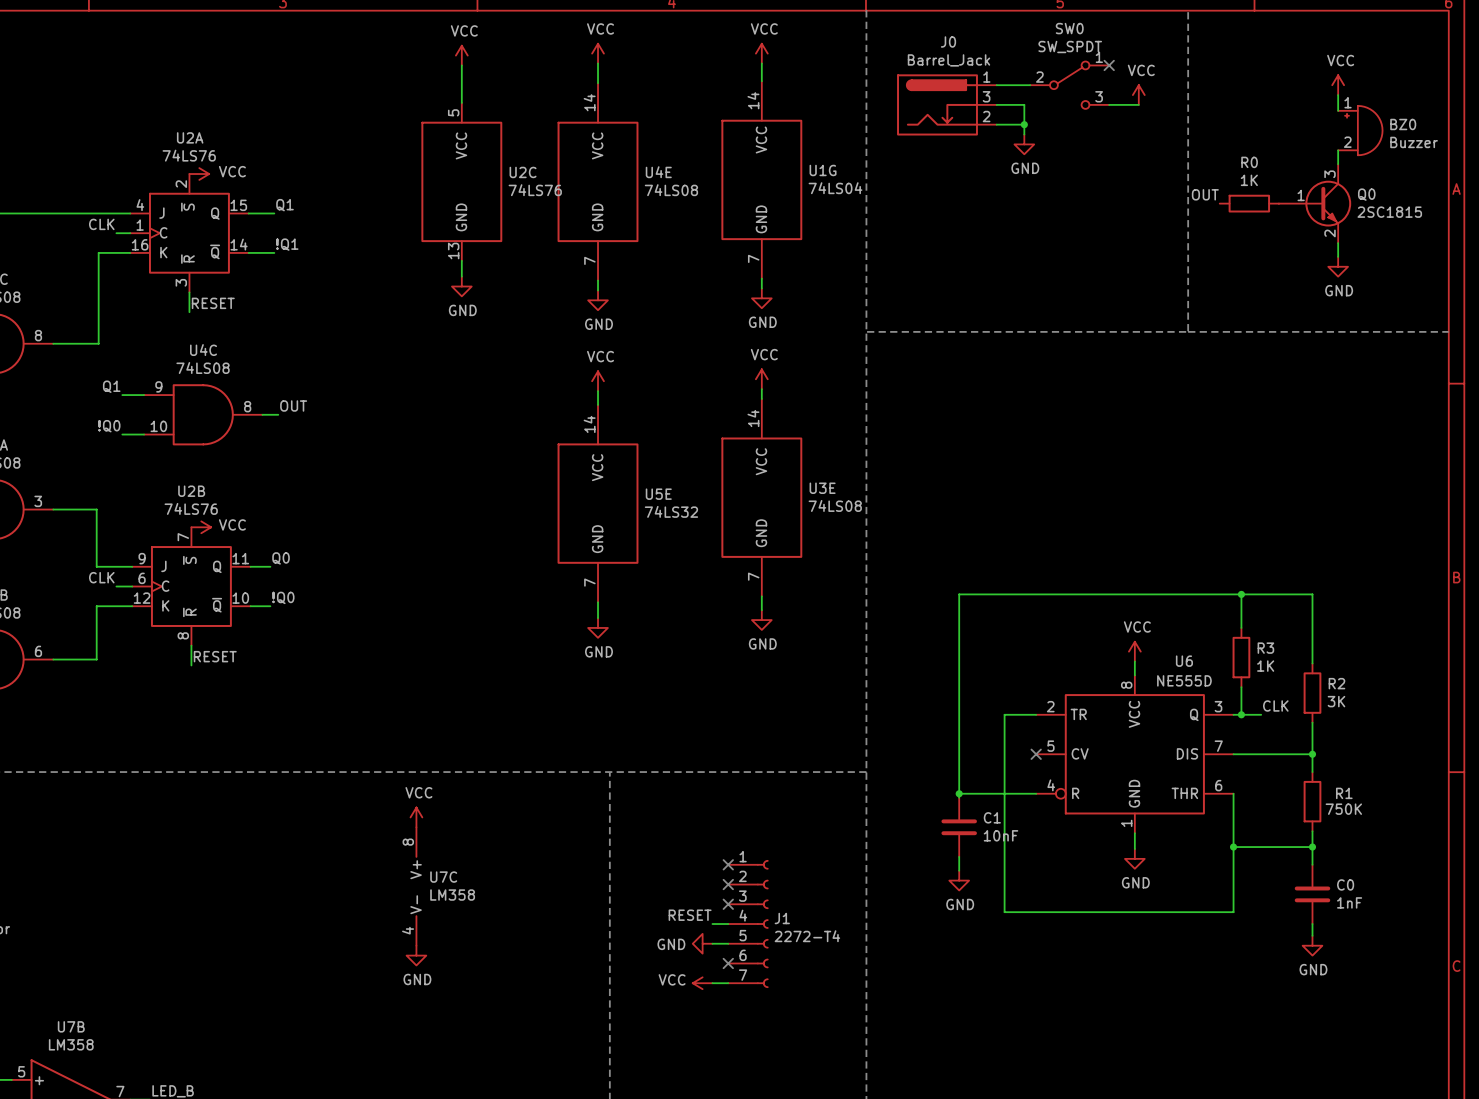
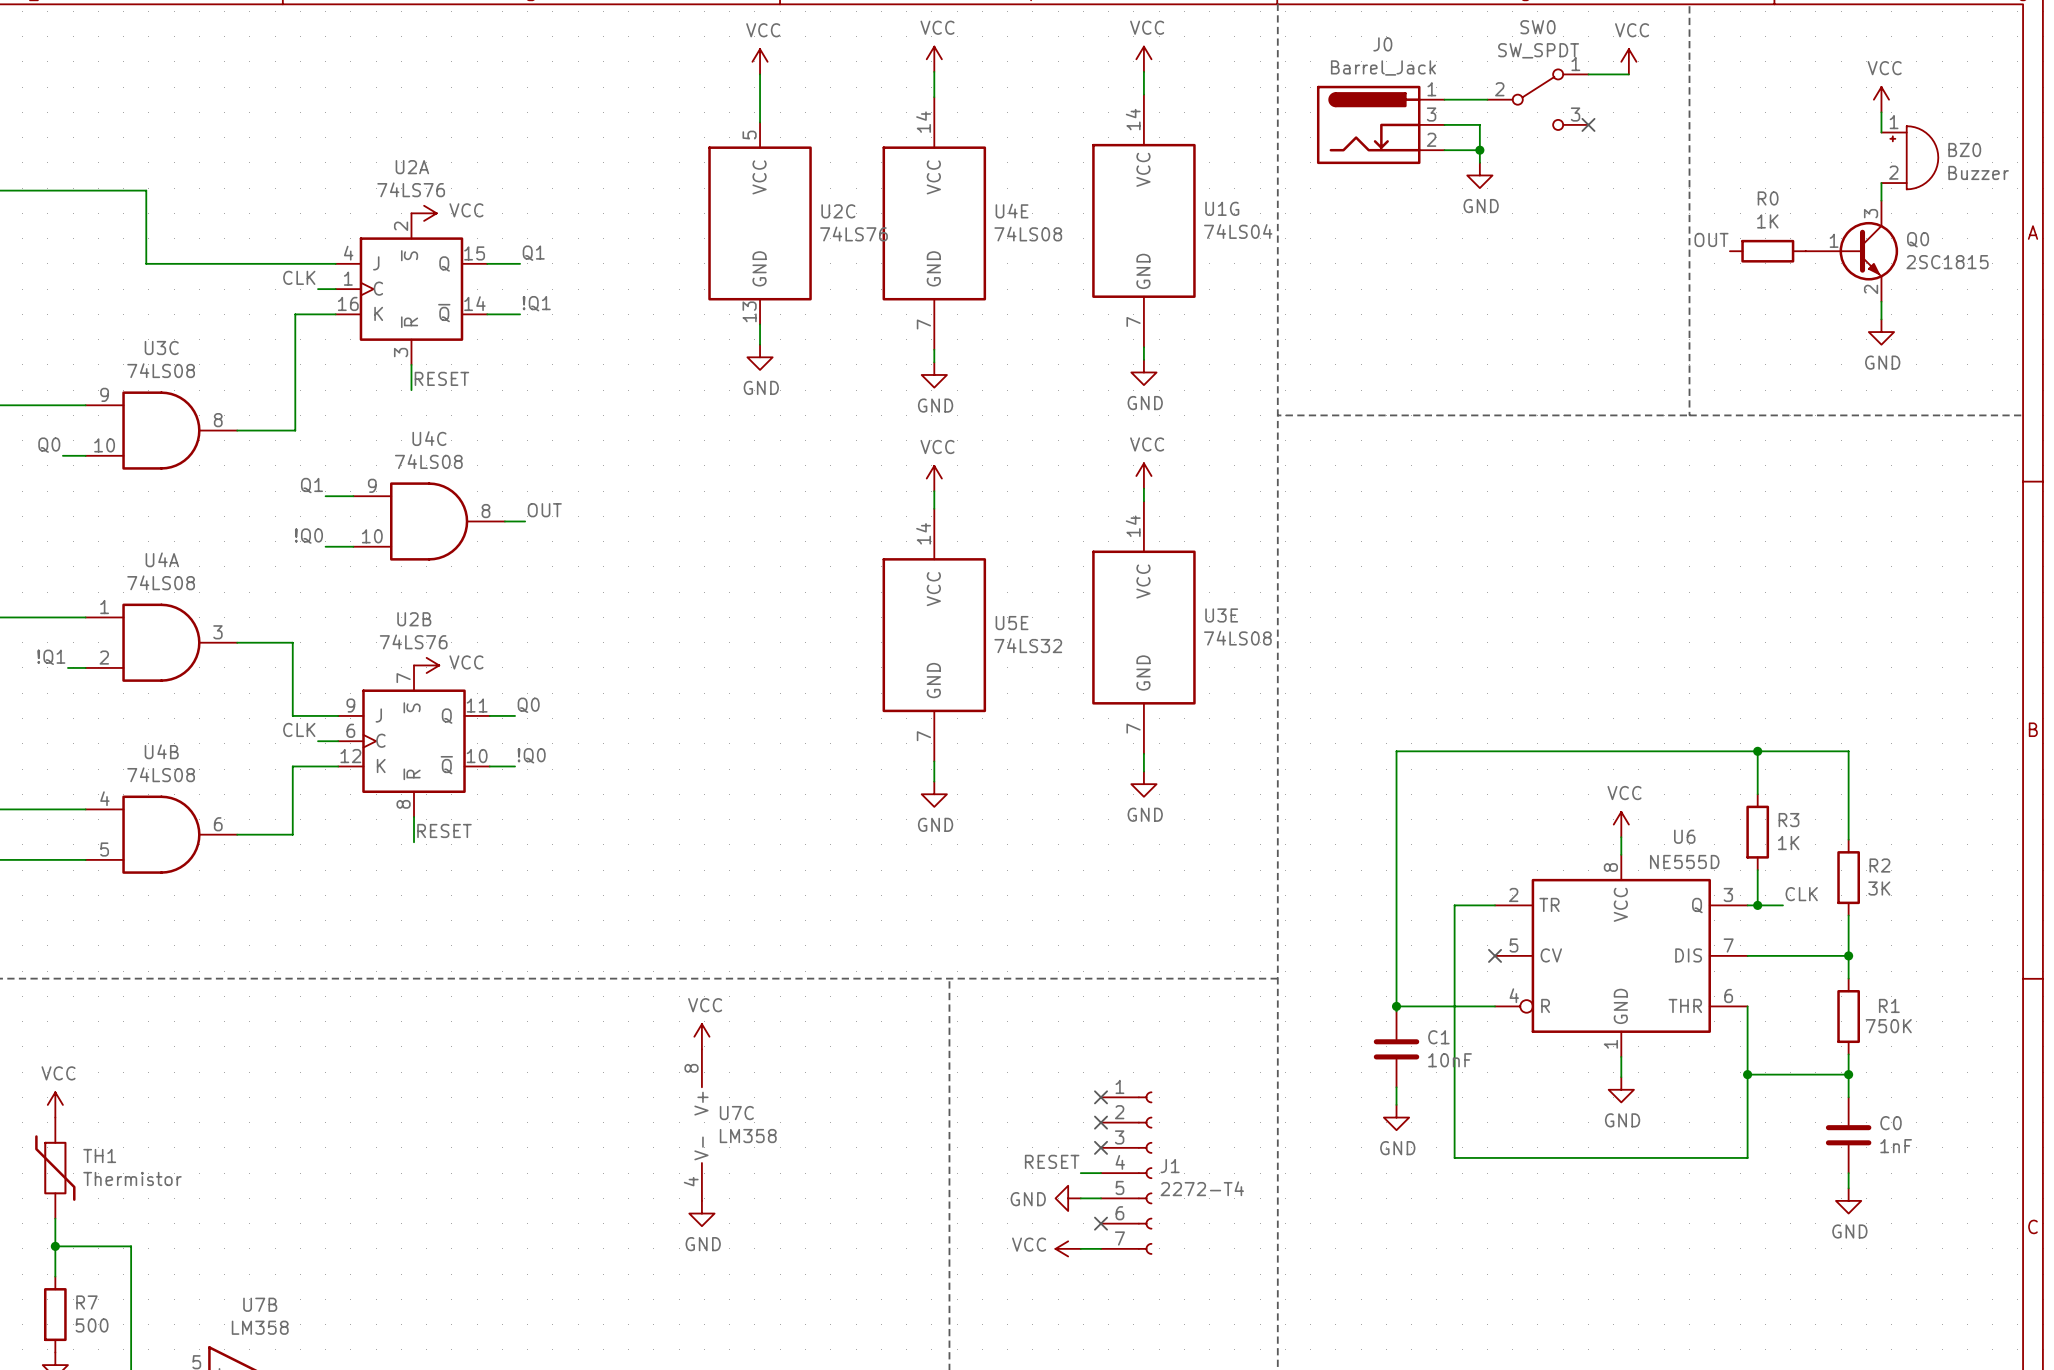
wire: none -> (1588, 74) (1628, 74)
no-connect mark position: (1109, 65) -> (1588, 124)
power symbol position: VCC (1138, 95) -> VCC (1628, 61)
wire: (1109, 104) (1138, 104) -> none

